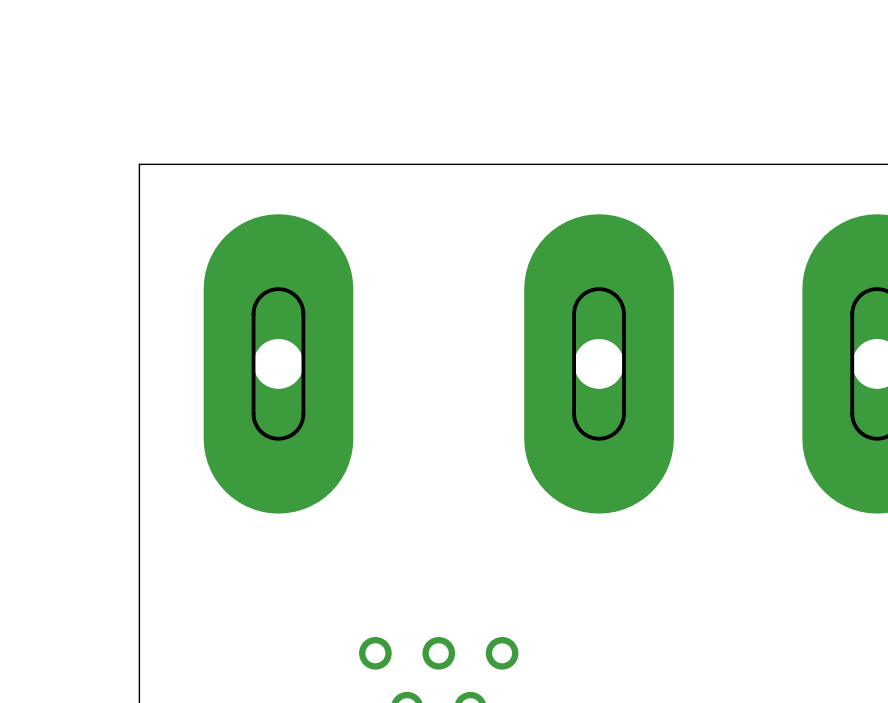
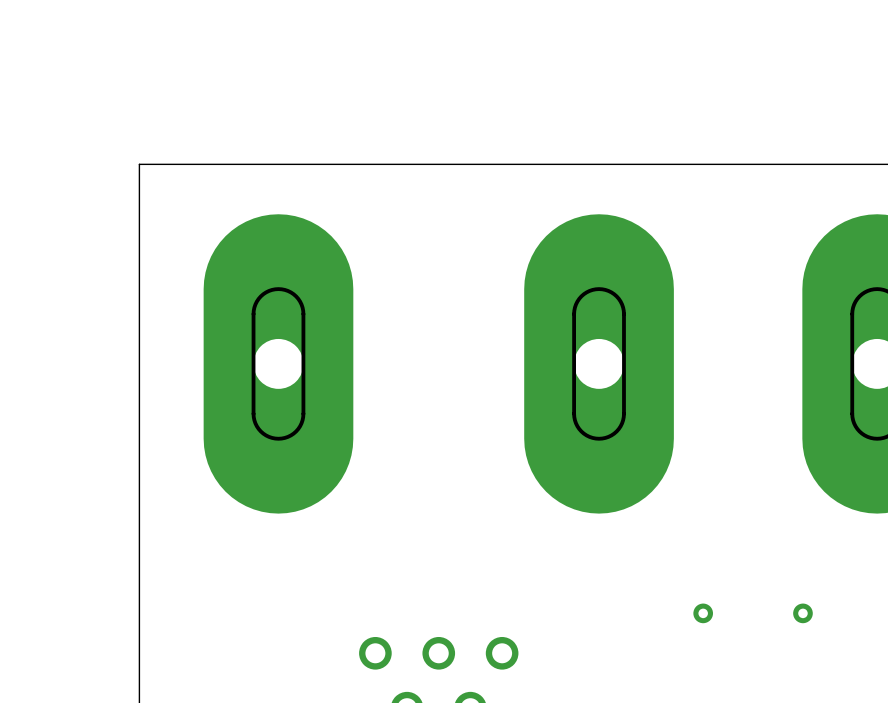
via: none -> (703, 613)
via: none -> (802, 613)

